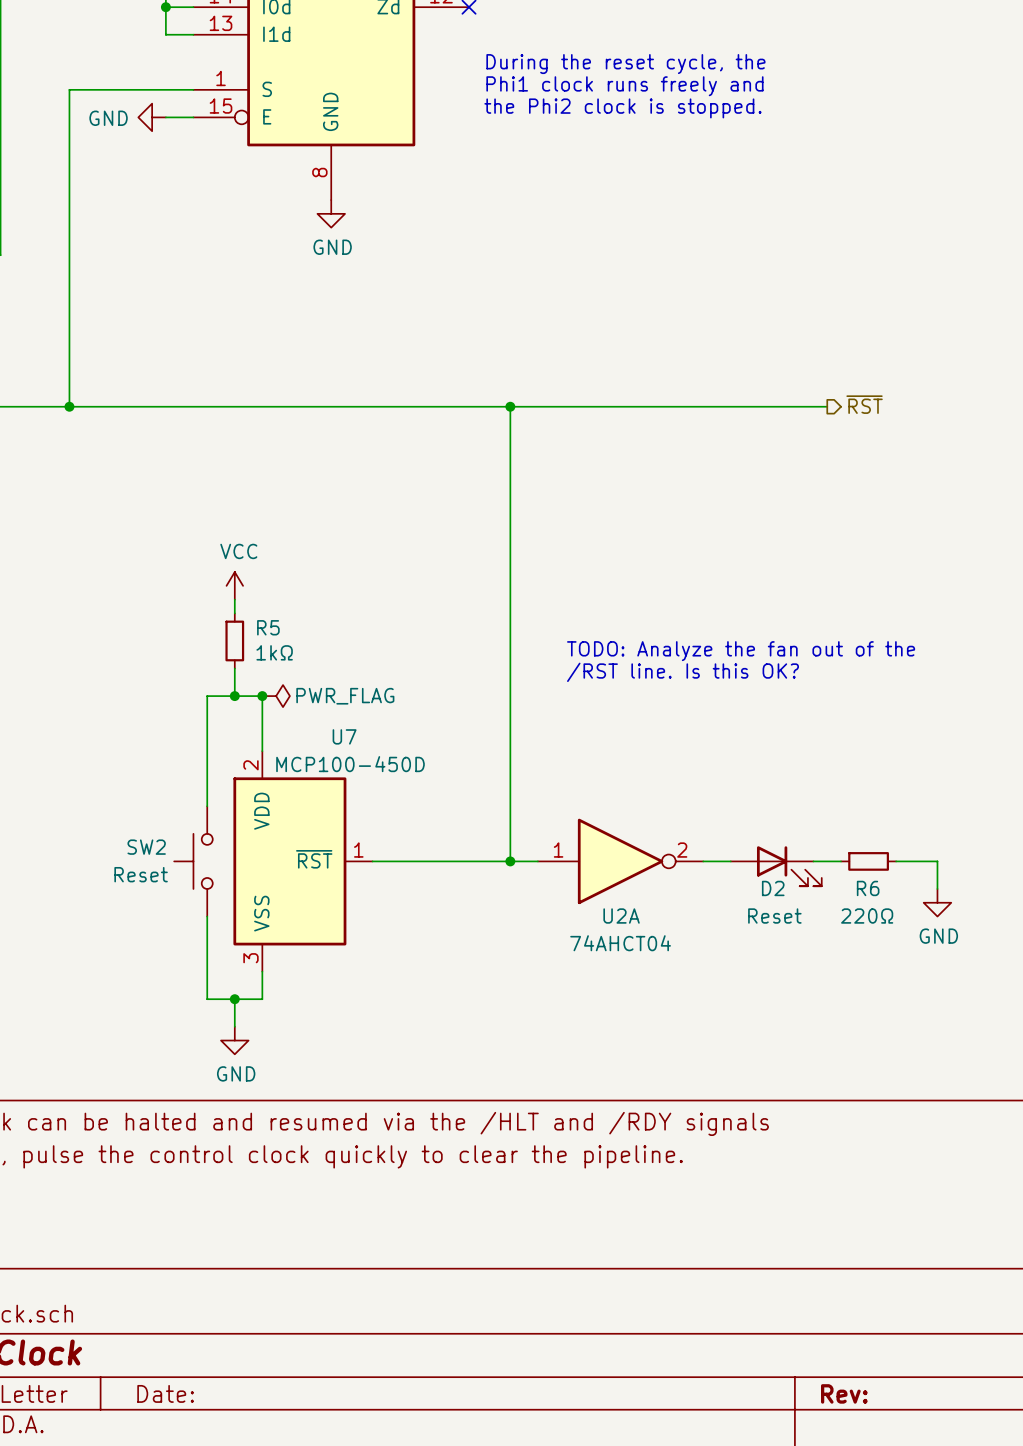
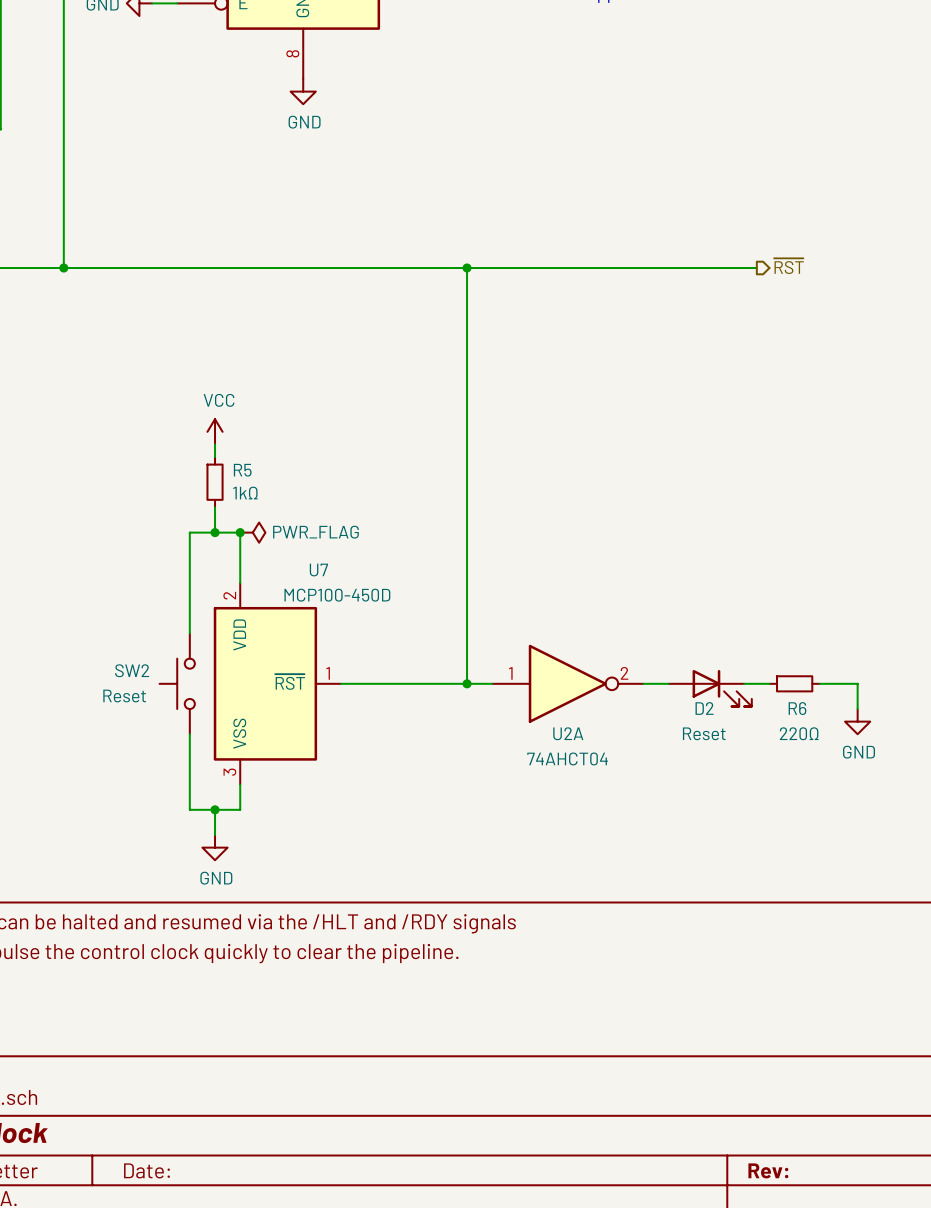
text: TODO: Analyze the fan out of the (741, 651) -> none
text: /RST line. Is this OK? (683, 672) -> none

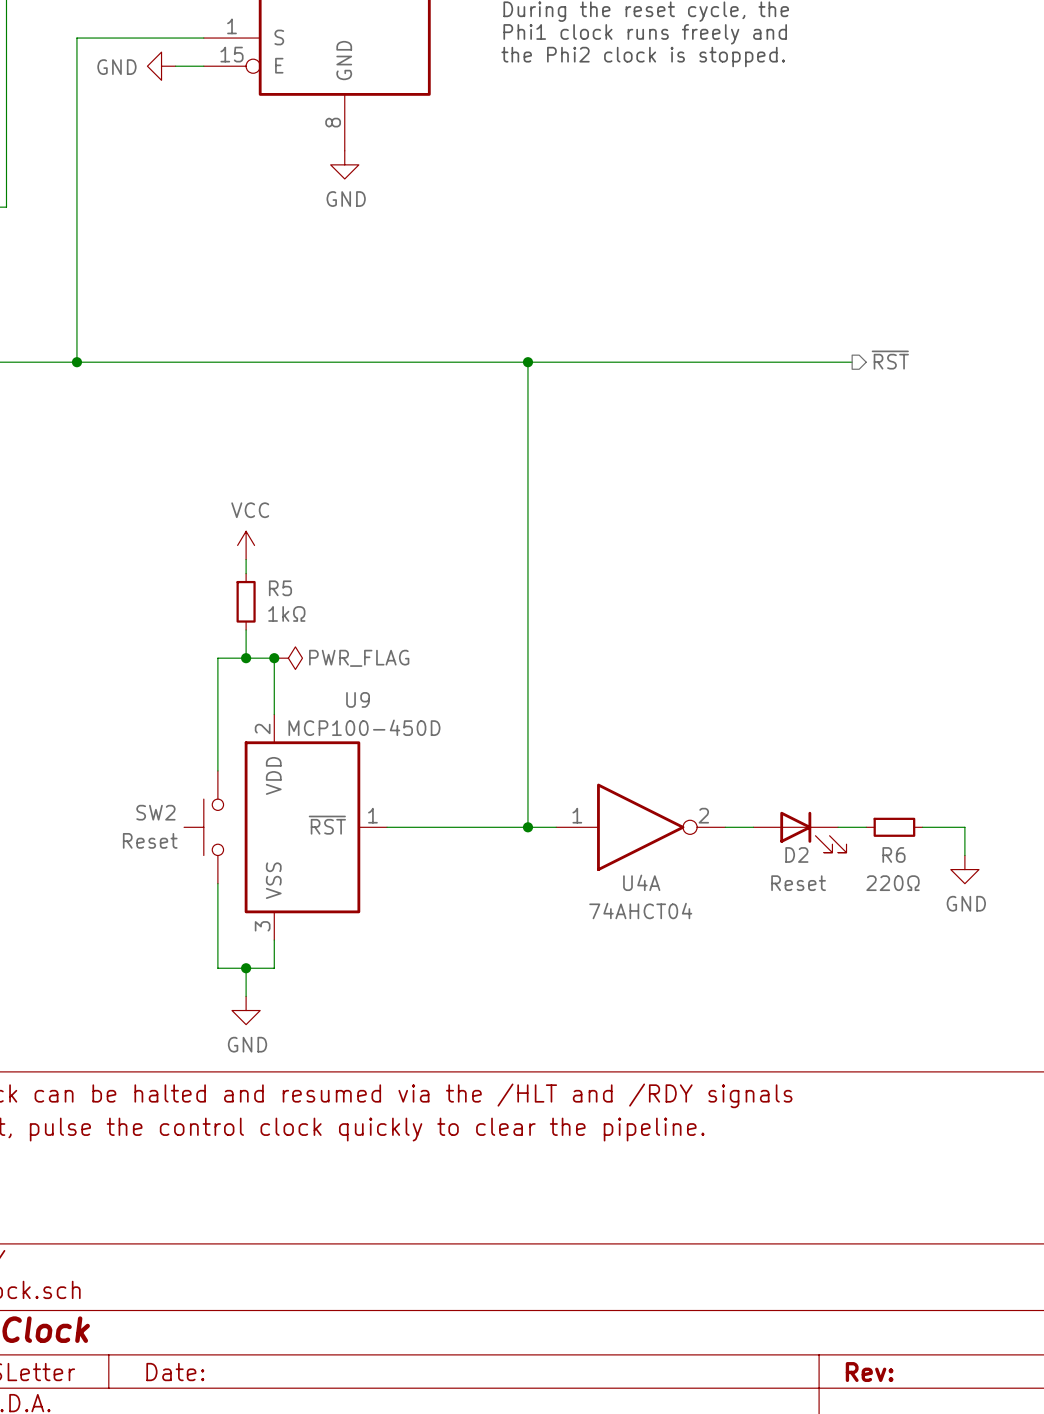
U7 name: U7 (318, 570) -> U9 (358, 699)
U2A name: U2A (568, 733) -> U4A (641, 882)

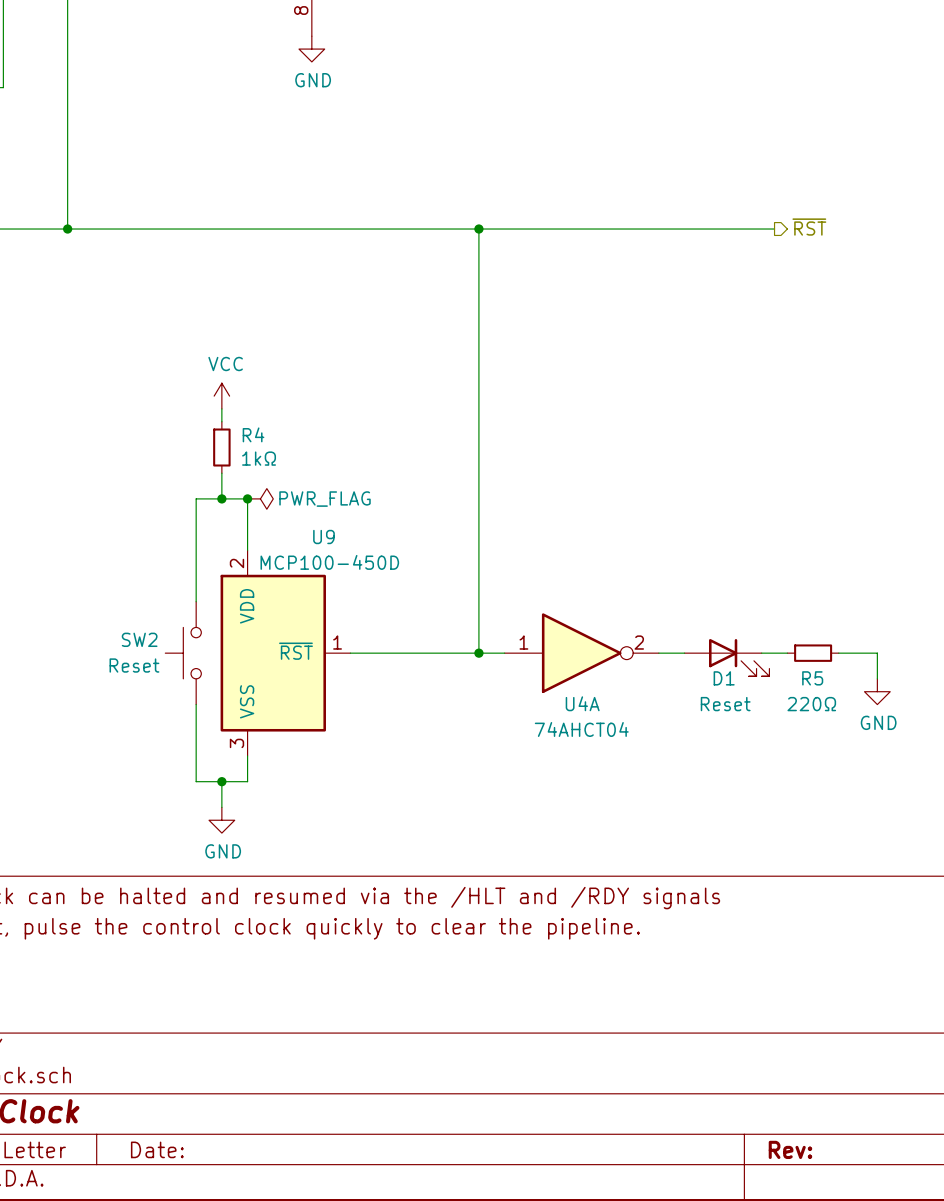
R5 name: R5 (280, 588) -> R4 (253, 434)
D2 name: D2 (796, 854) -> D1 (724, 678)
R6 name: R6 (893, 854) -> R5 (812, 678)

